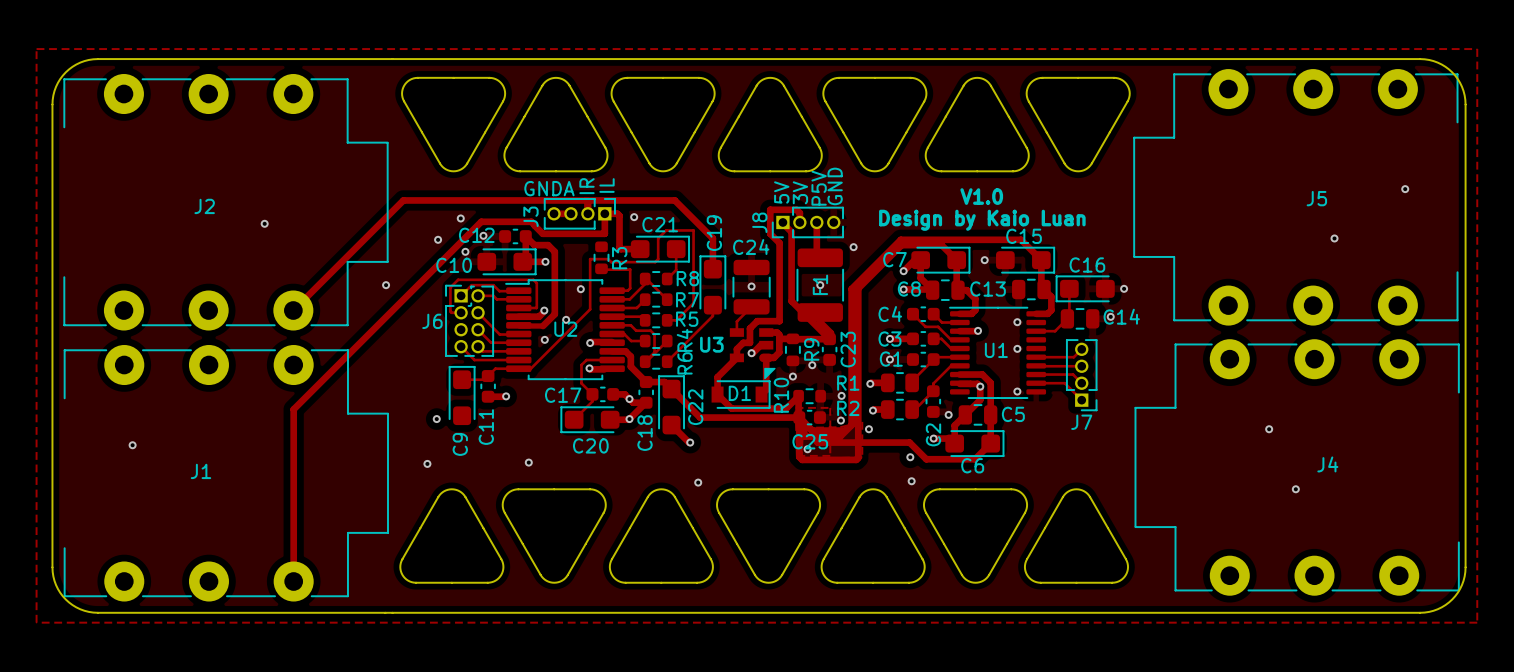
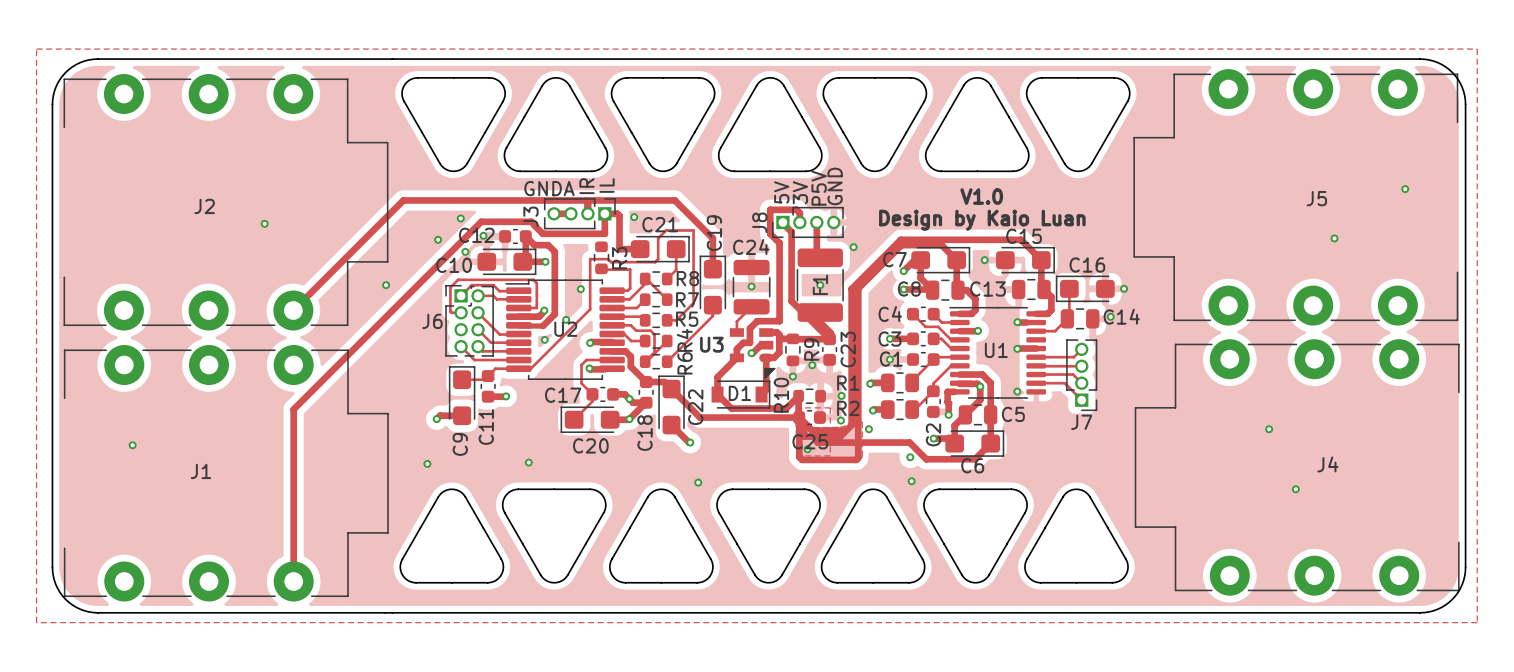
track: none -> (1017, 322) (1026, 322)
track: none -> (1036, 348) (1017, 348)
track: none -> (954, 391) (947, 391) (948, 410)
track: none -> (462, 415) (440, 415) (436, 419)

